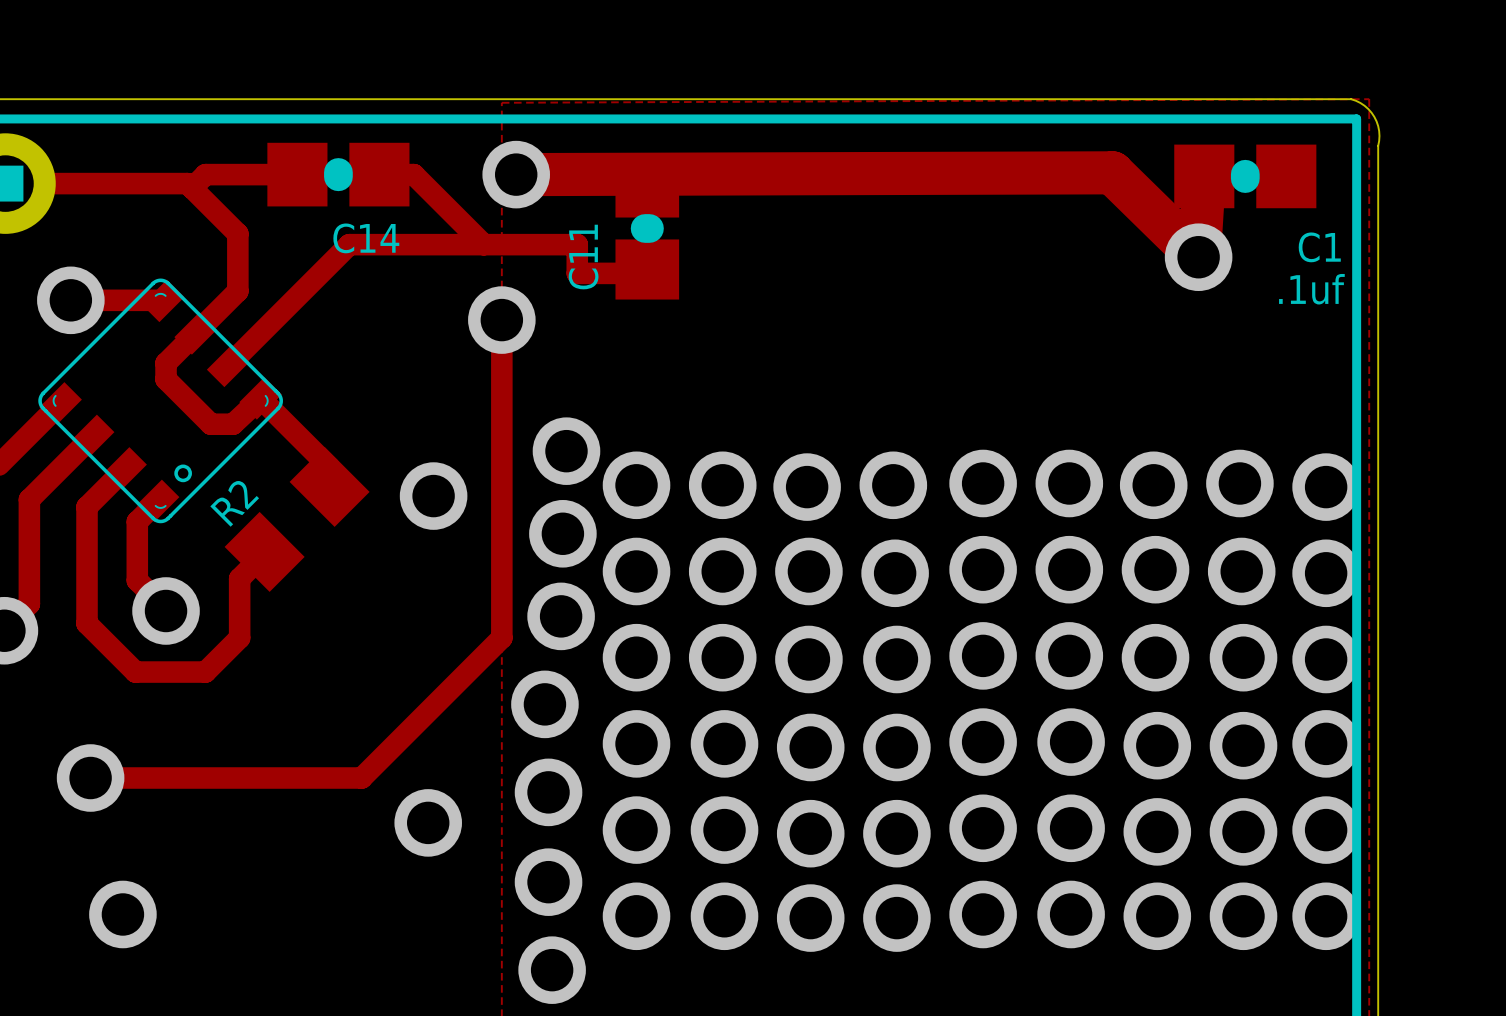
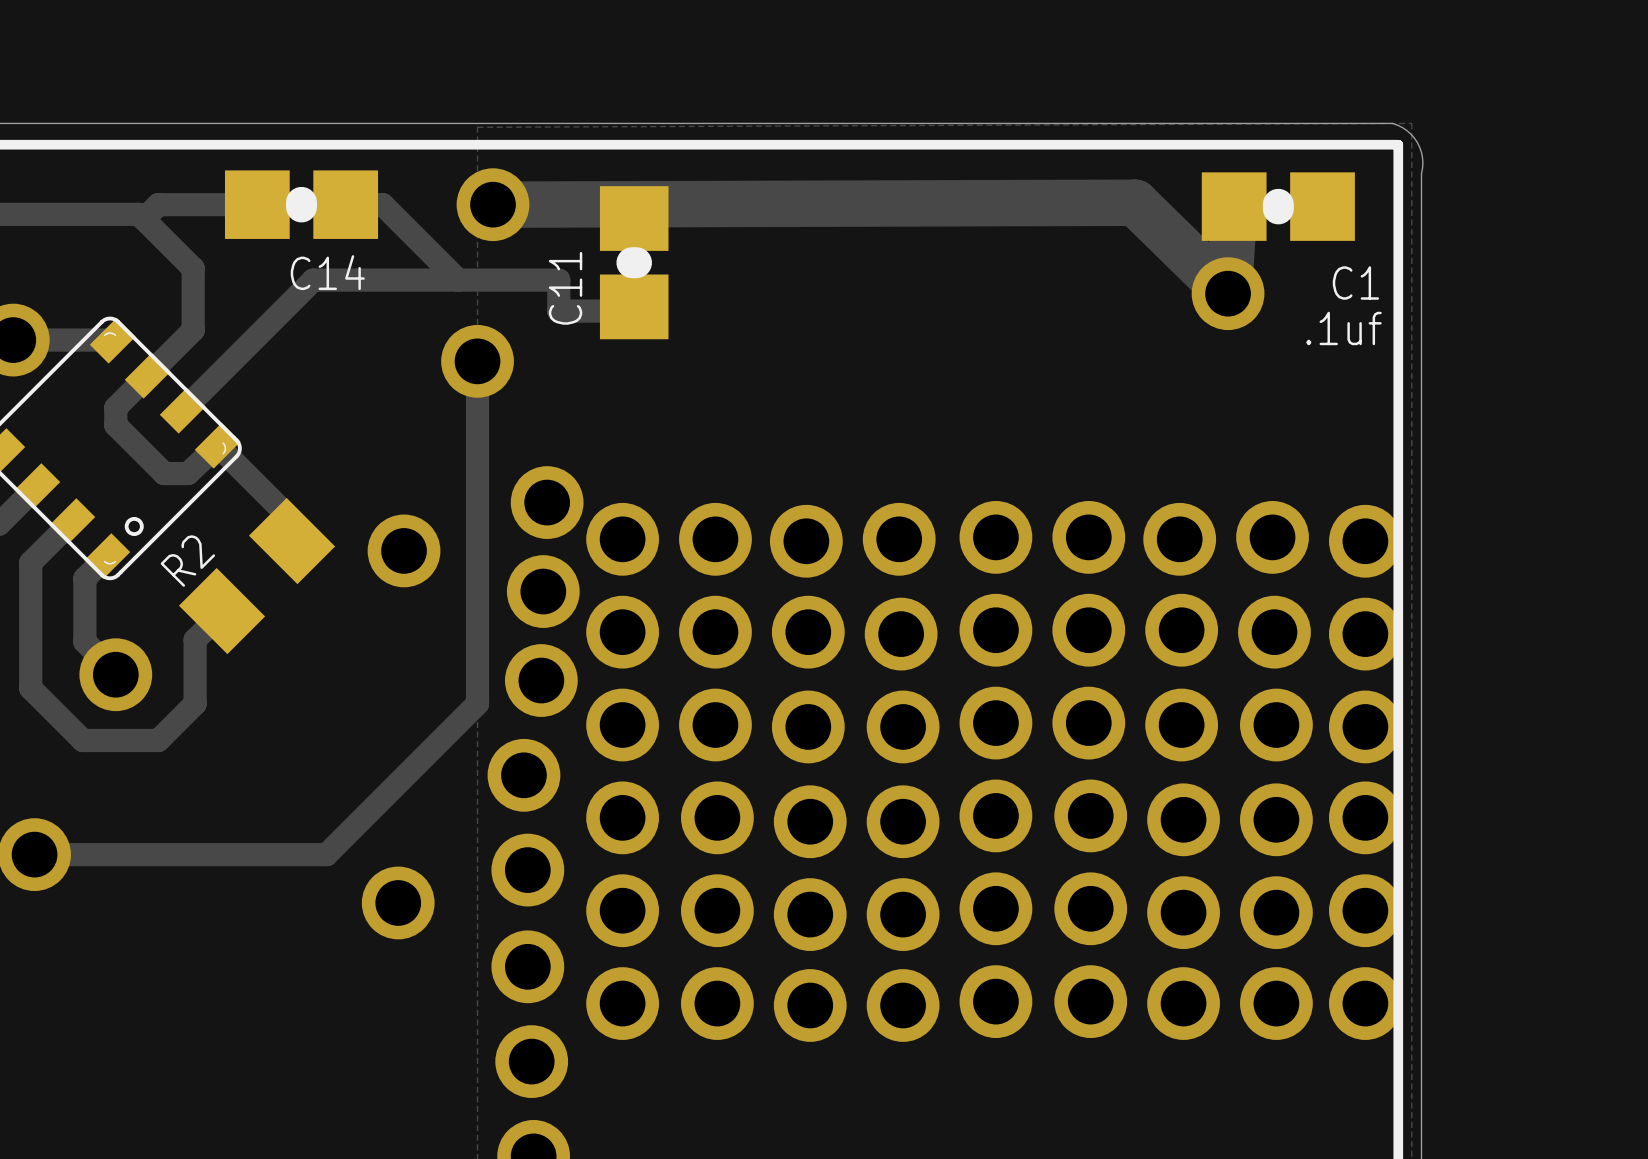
via: (122, 914) -> none

